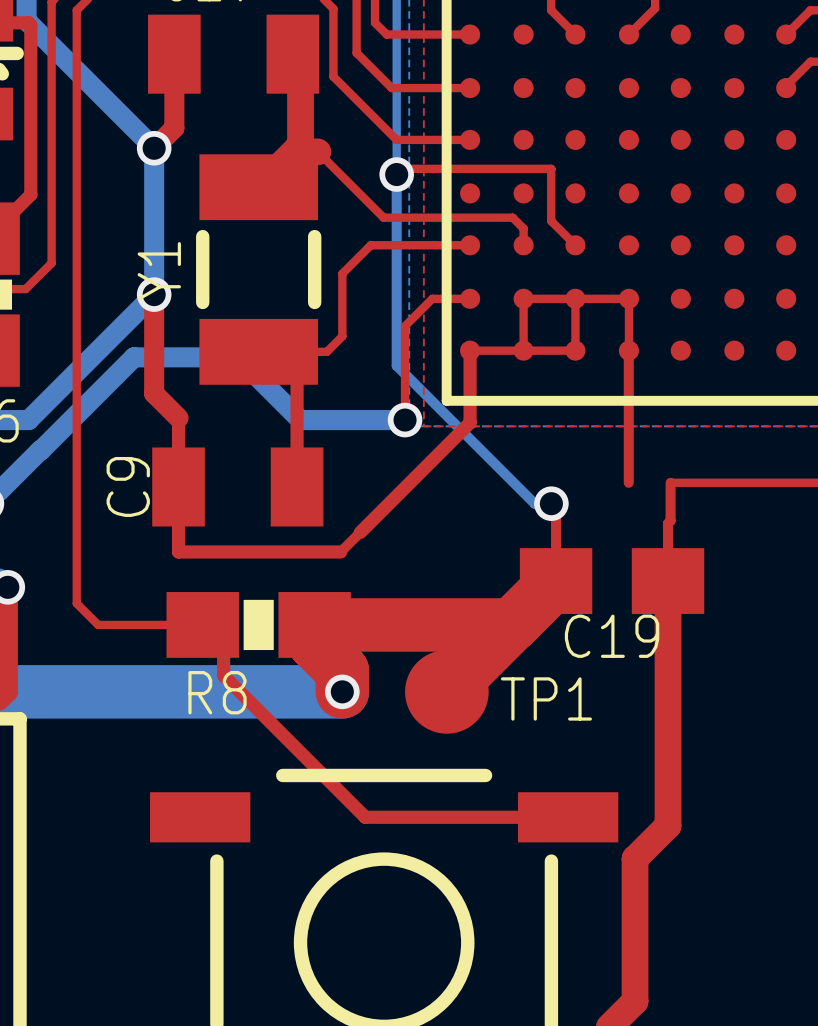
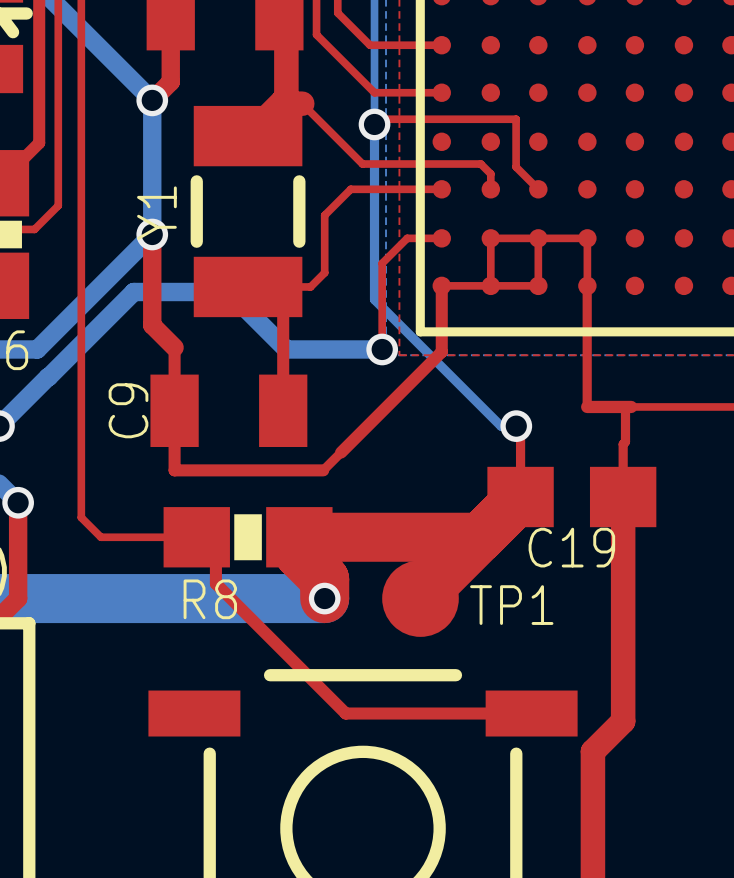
top track: none -> (587, 406) (631, 406)

